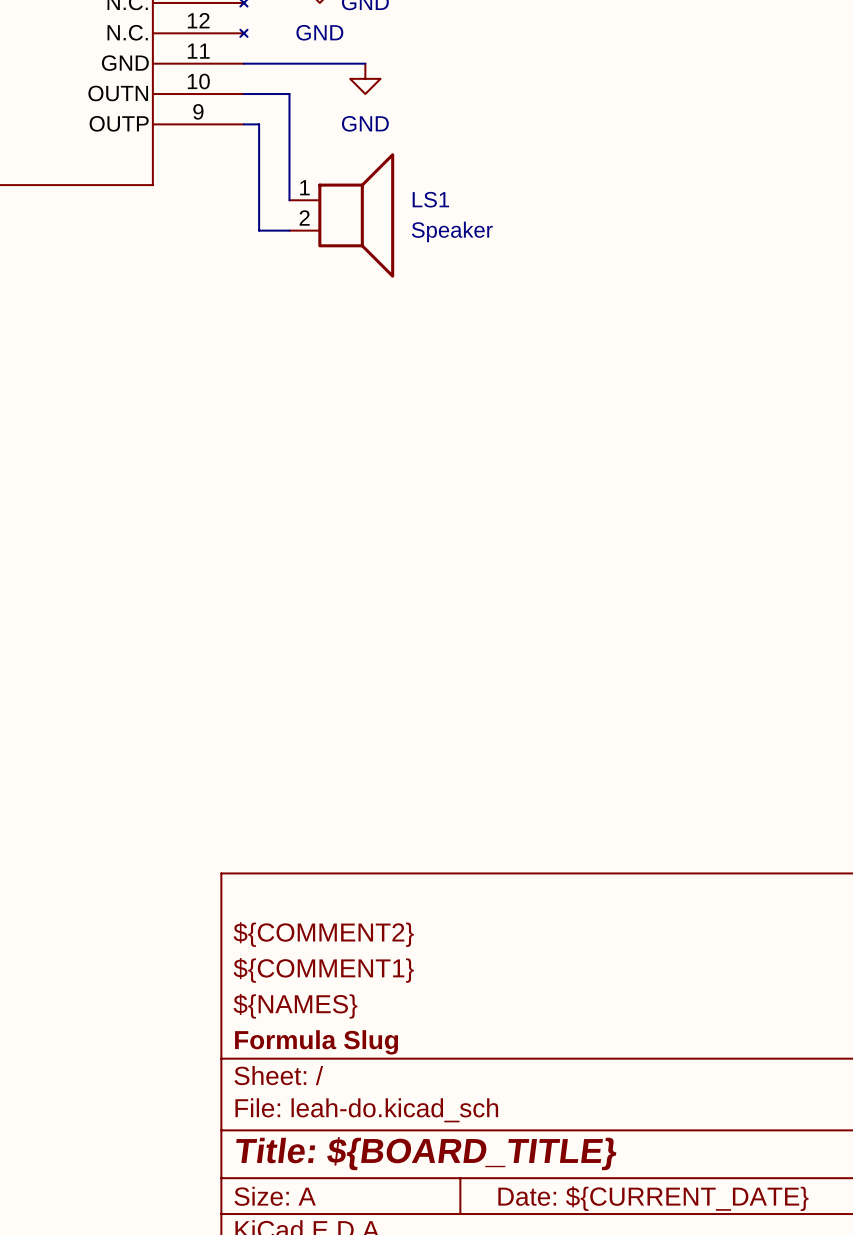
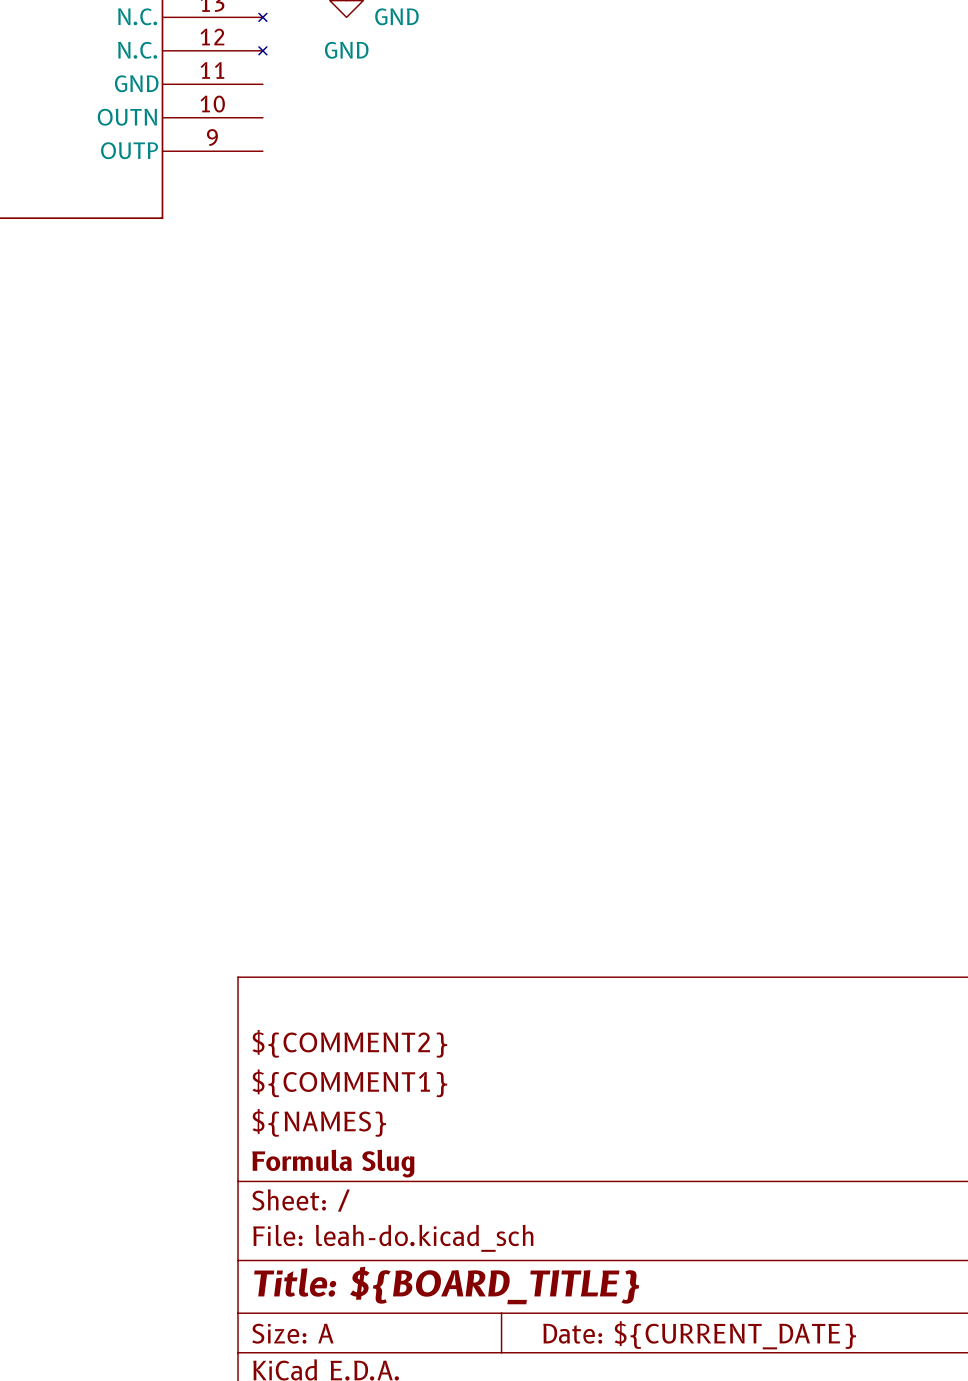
wire: (243, 63) (365, 63) -> none
power symbol: GND (365, 78) -> none
wire: (243, 94) (289, 94) (289, 200) -> none
wire: (243, 124) (259, 124) (259, 230) (289, 230) -> none
LS1: Speaker (341, 215) -> none

